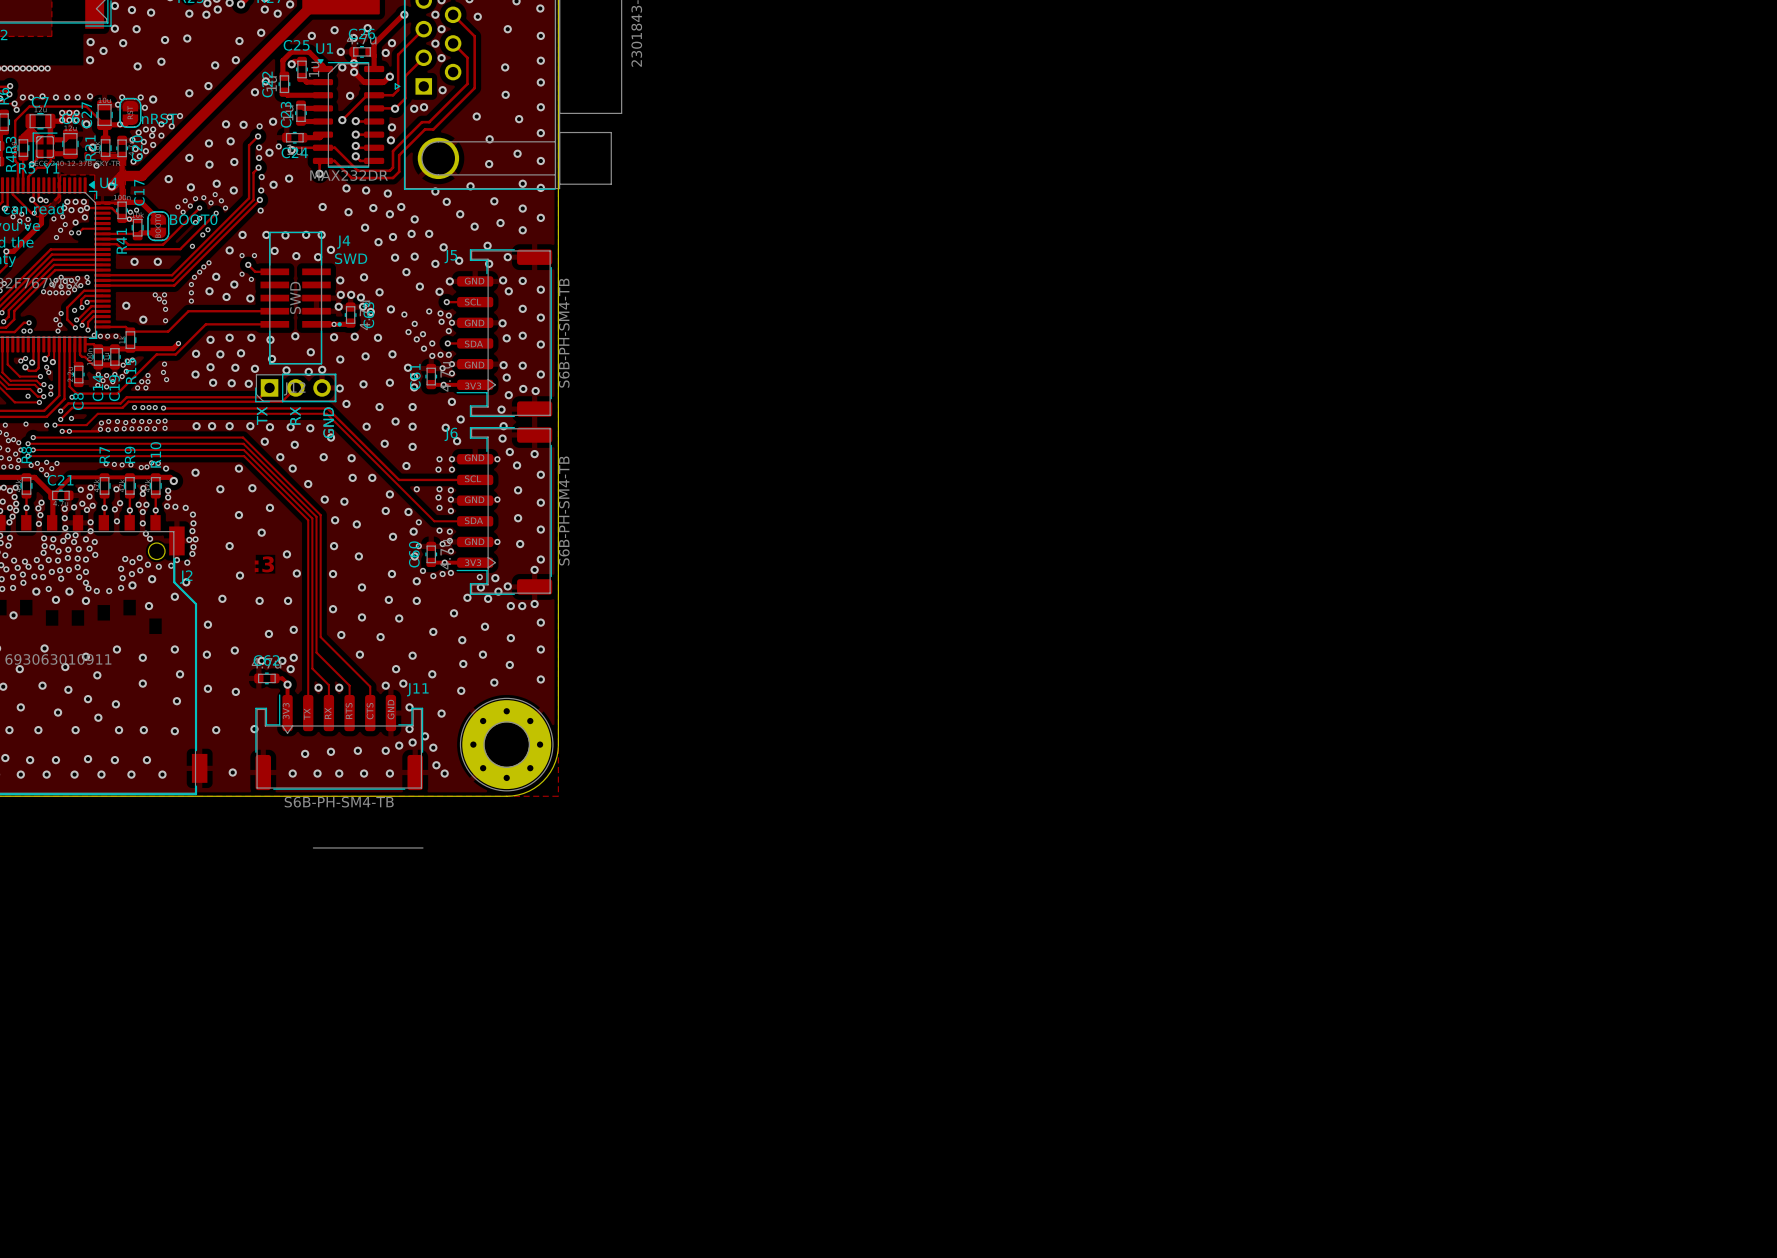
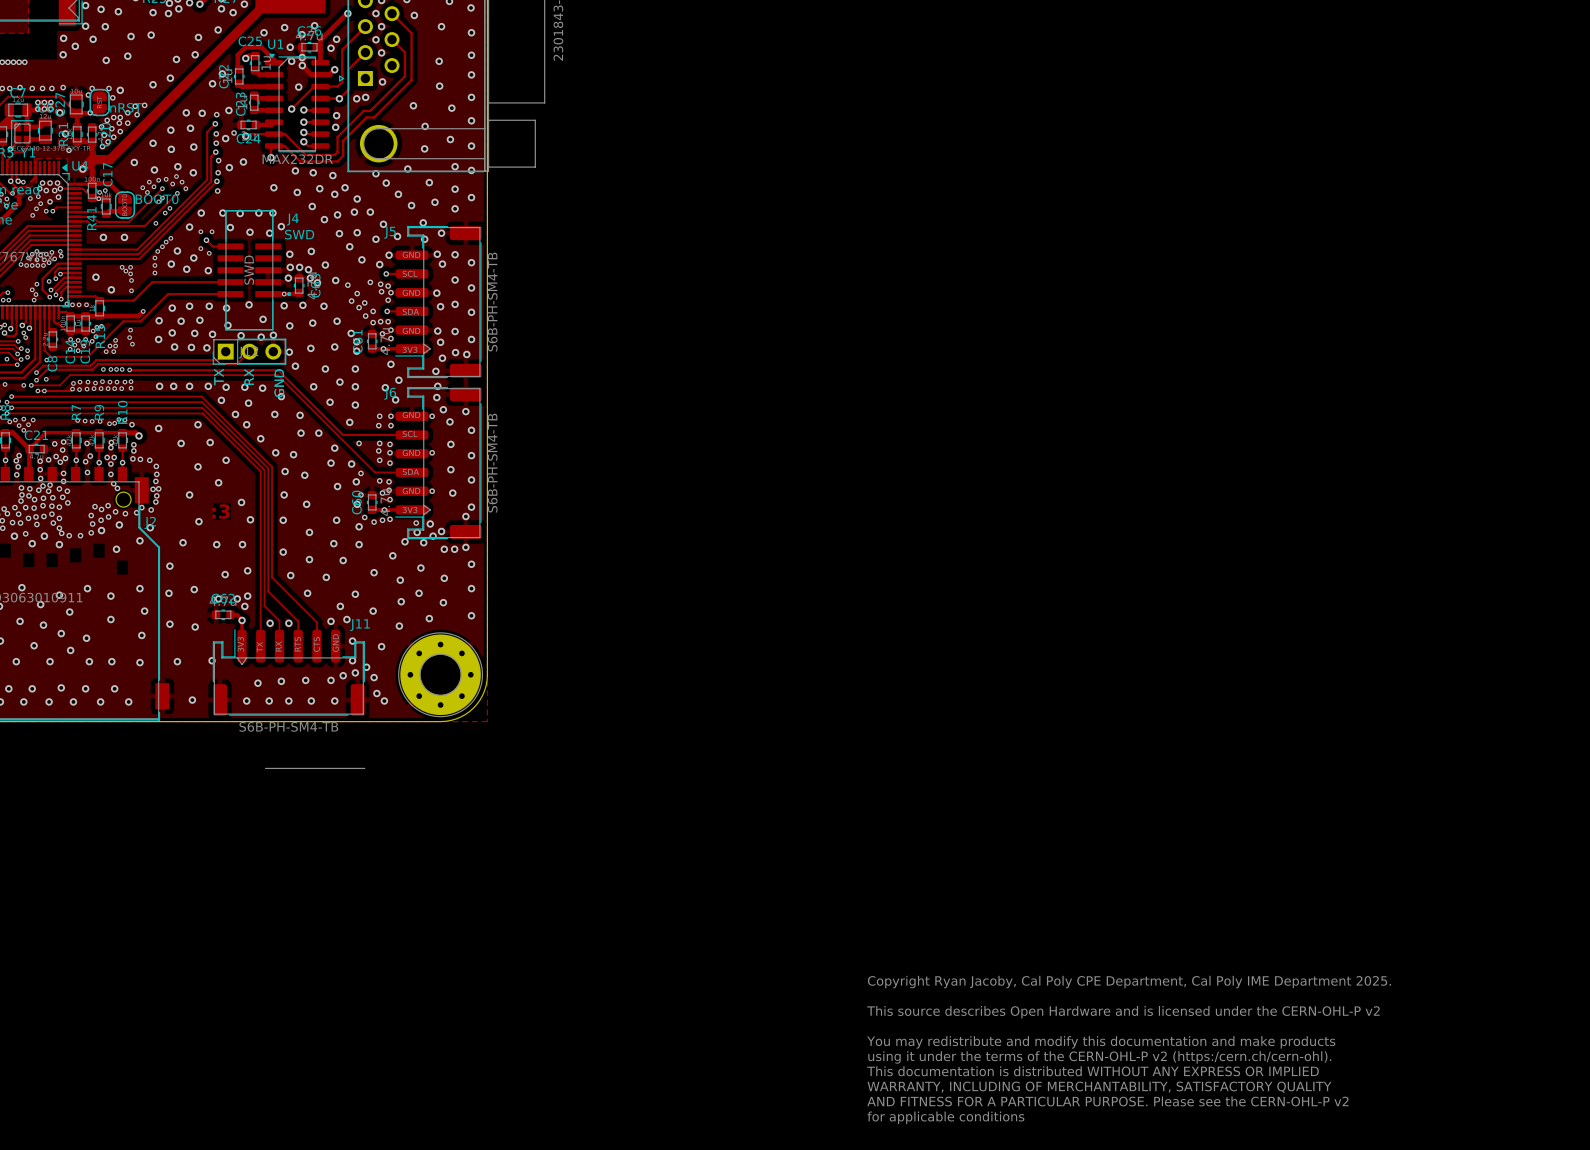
text: none -> Copyright Ryan Jacoby, Cal Poly CPE Department, Cal Poly IME Department 2025. (1129, 982)
text: none -> This source describes Open Hardware and is licensed under the CERN-OHL-P v2 (1123, 1012)
text: none -> You may redistribute and modify this documentation and make products (1101, 1042)
text: none -> using it under the terms of the CERN-OHL-P v2 (https:/cern.ch/cern-ohl). (1099, 1057)
text: none -> This documentation is distributed WITHOUT ANY EXPRESS OR IMPLIED (1092, 1071)
text: none -> WARRANTY, INCLUDING OF MERCHANTABILITY, SATISFACTORY QUALITY (1099, 1087)
text: none -> AND FITNESS FOR A PARTICULAR PURPOSE. Please see the CERN-OHL-P v2 (1107, 1101)
text: none -> for applicable conditions (945, 1117)

